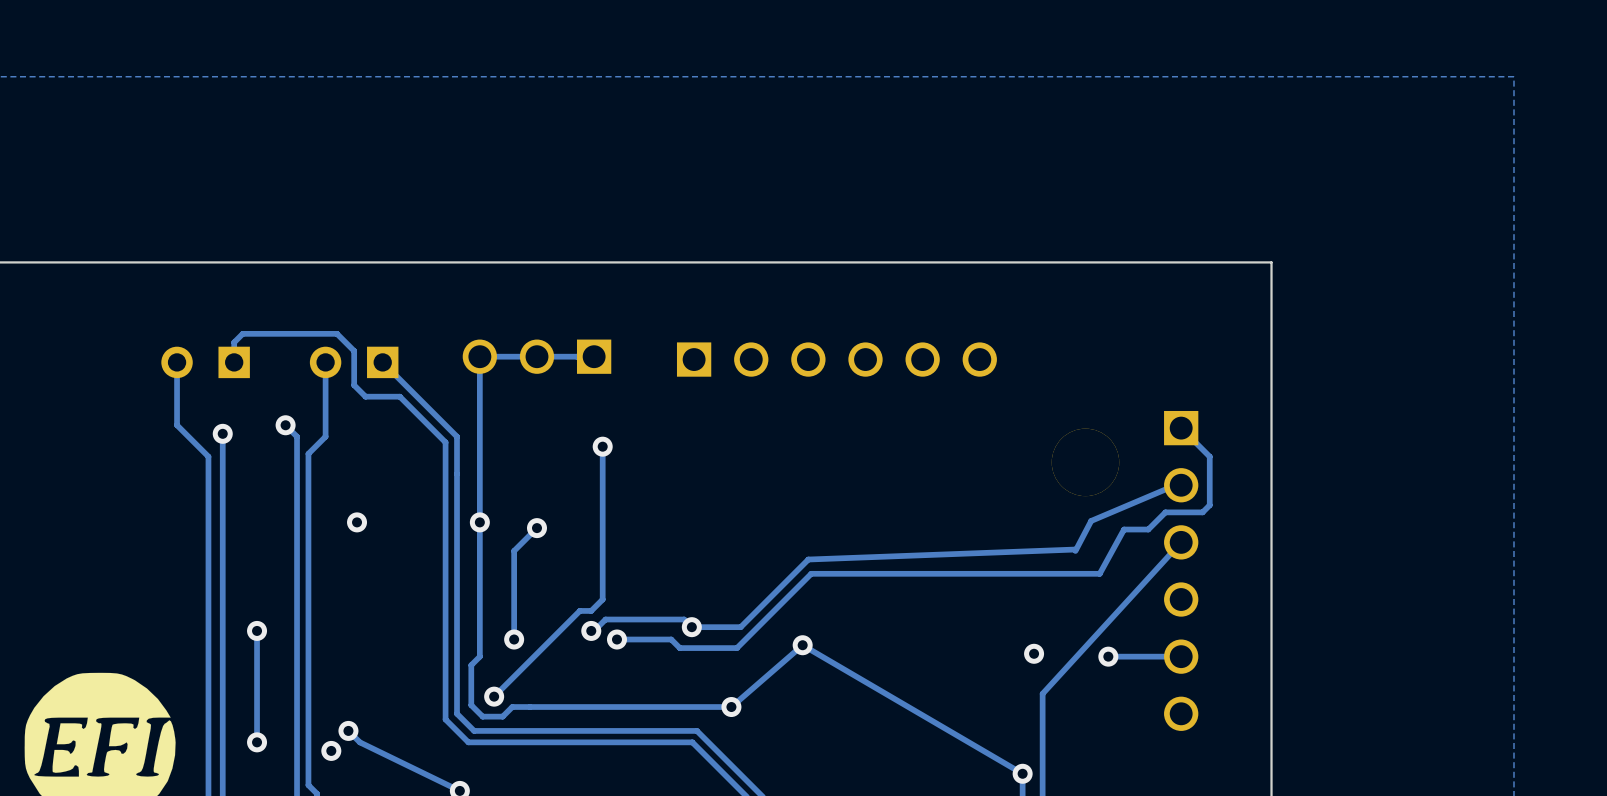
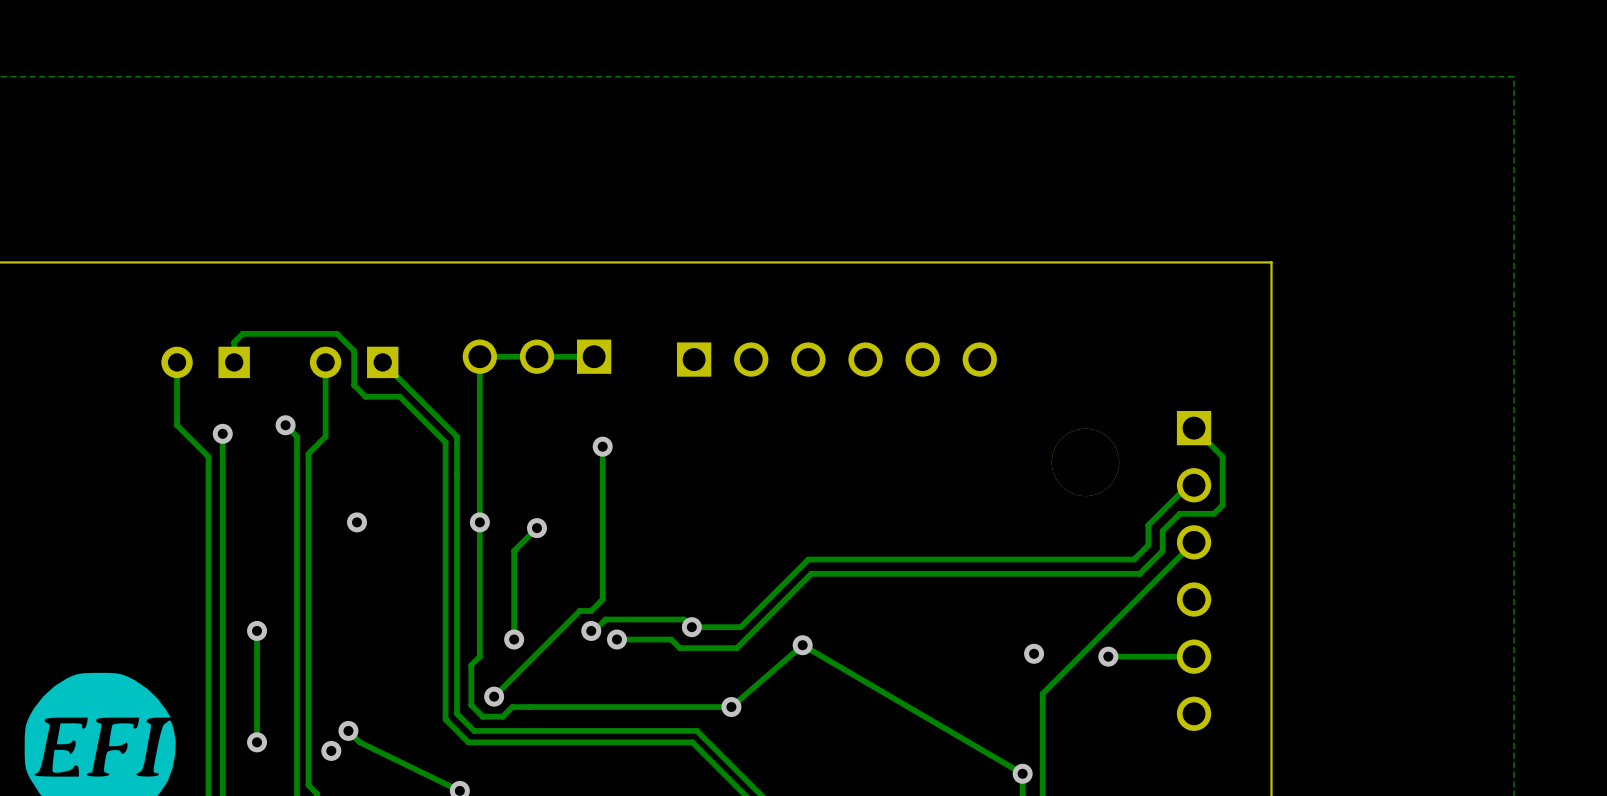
track: (1181, 428) (1209, 456) (1209, 505) (1202, 512) (1165, 512) (1148, 529) (1124, 529) (1099, 573) -> (1194, 428) (1222, 456) (1222, 505) (1214, 513) (1179, 513) (1162, 530) (1162, 550) (1139, 573) (1099, 573)
track: (1181, 485) (1175, 485) (1091, 520) (1075, 550) -> none
track: (1181, 542) (1042, 693) -> (1194, 542) (1042, 693)
track: (1075, 549) (808, 559) -> (1194, 485) (1188, 485) (1148, 525) (1148, 545) (1134, 559) (808, 559)
part position: (1181, 570) -> (1194, 570)

